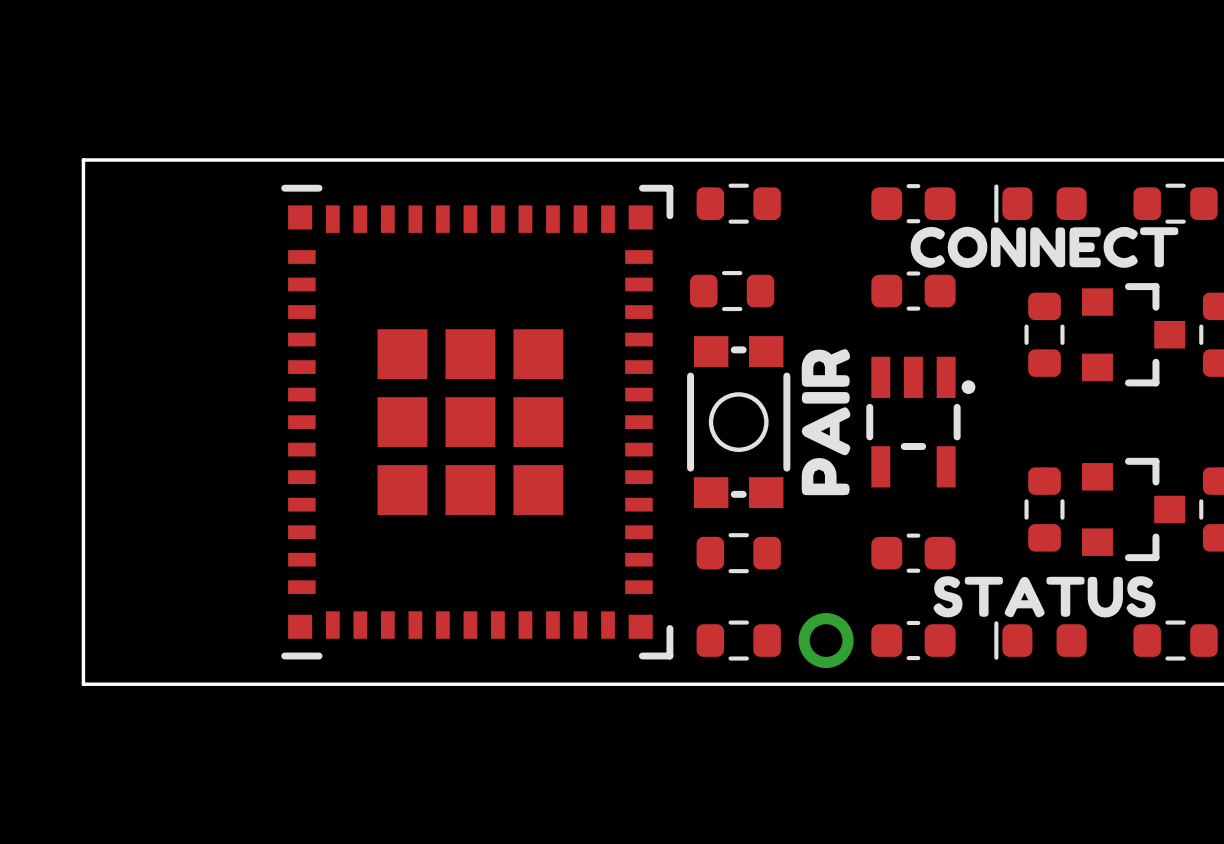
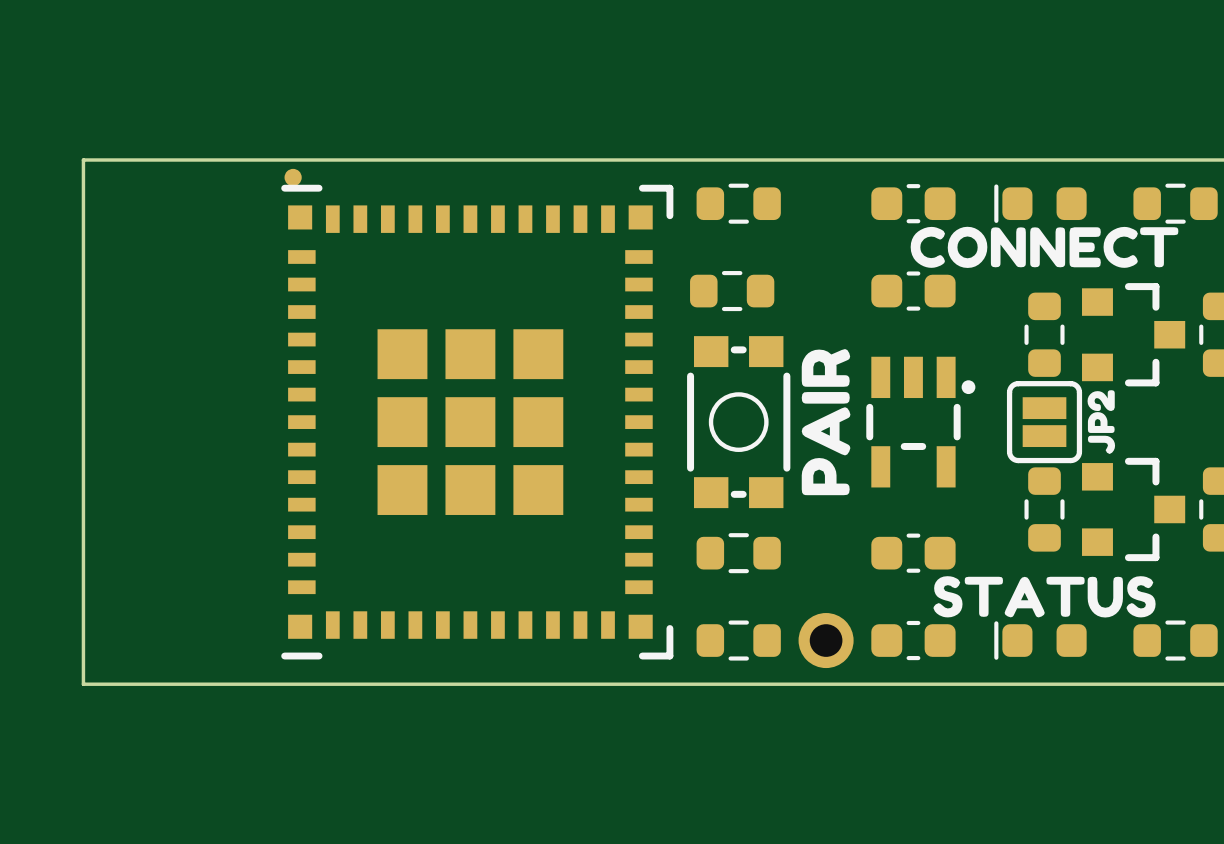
part: none -> (293, 177)
drawing: none -> [1087, 390, 1116, 455]
part: none -> (1044, 422)

